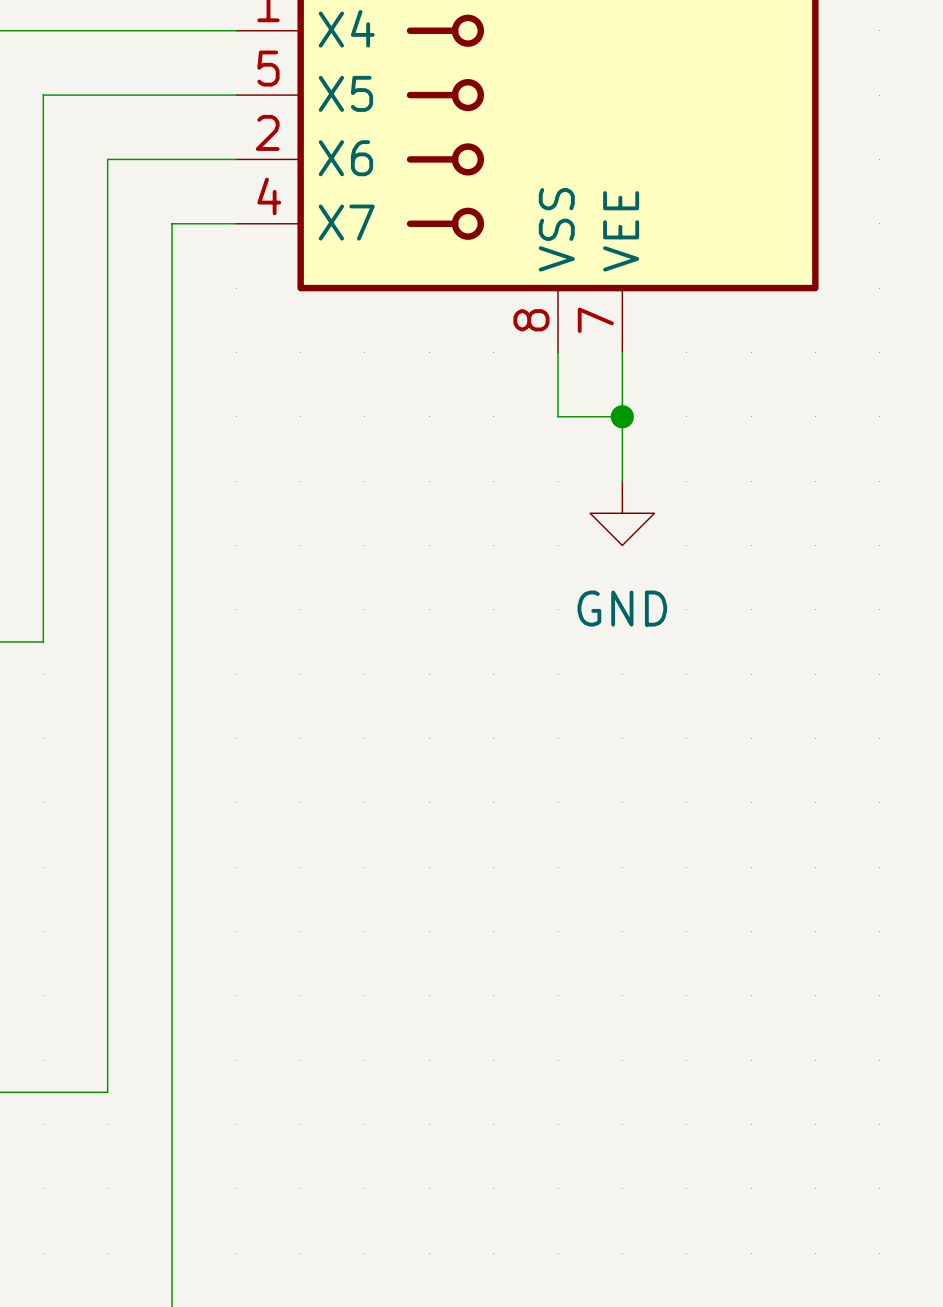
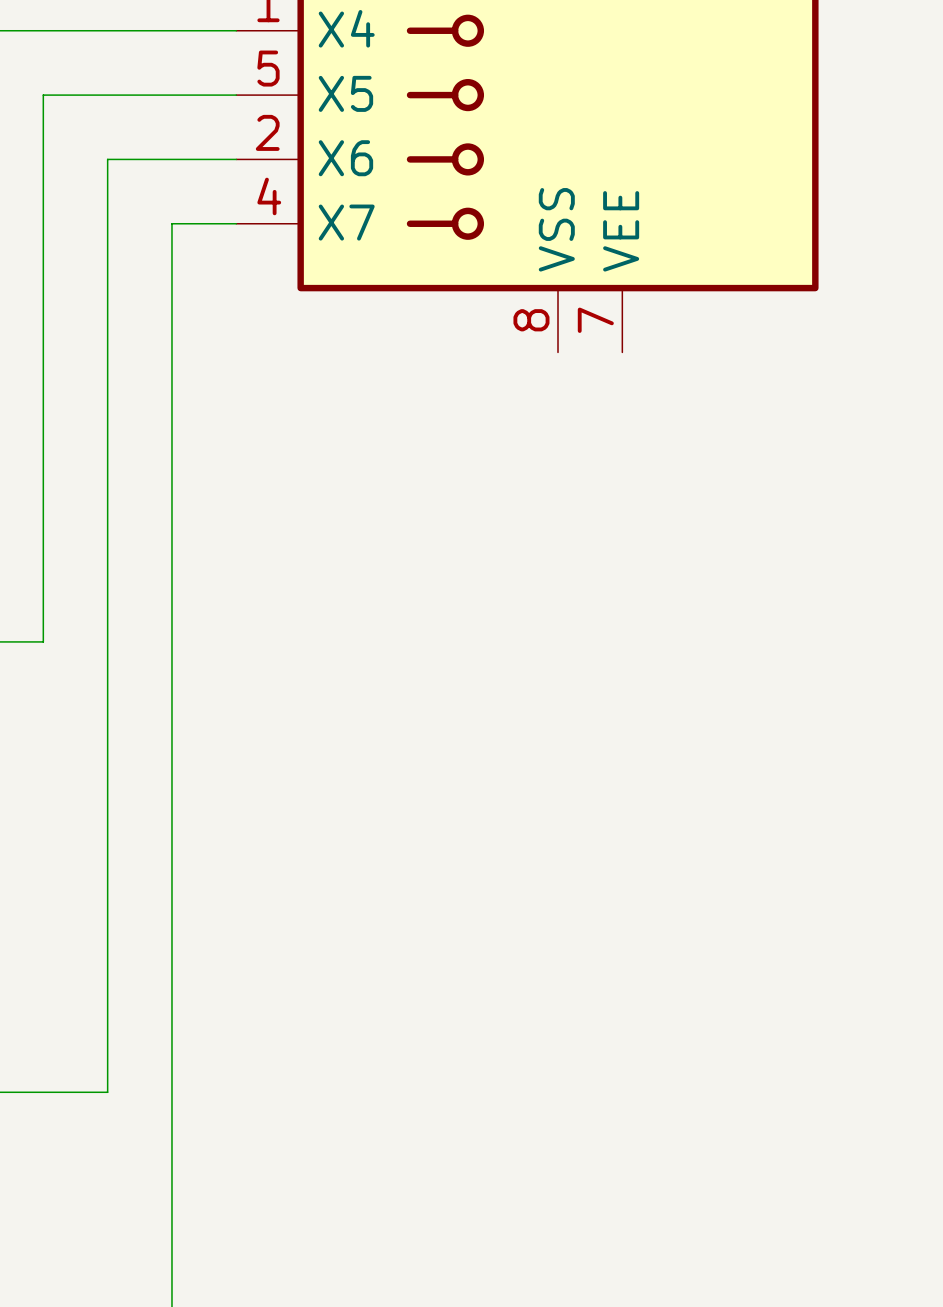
wire: (558, 352) (558, 416) (622, 416) -> none
wire: (622, 352) (622, 481) -> none
junction: (622, 416) -> none
power symbol: GND (622, 513) -> none

